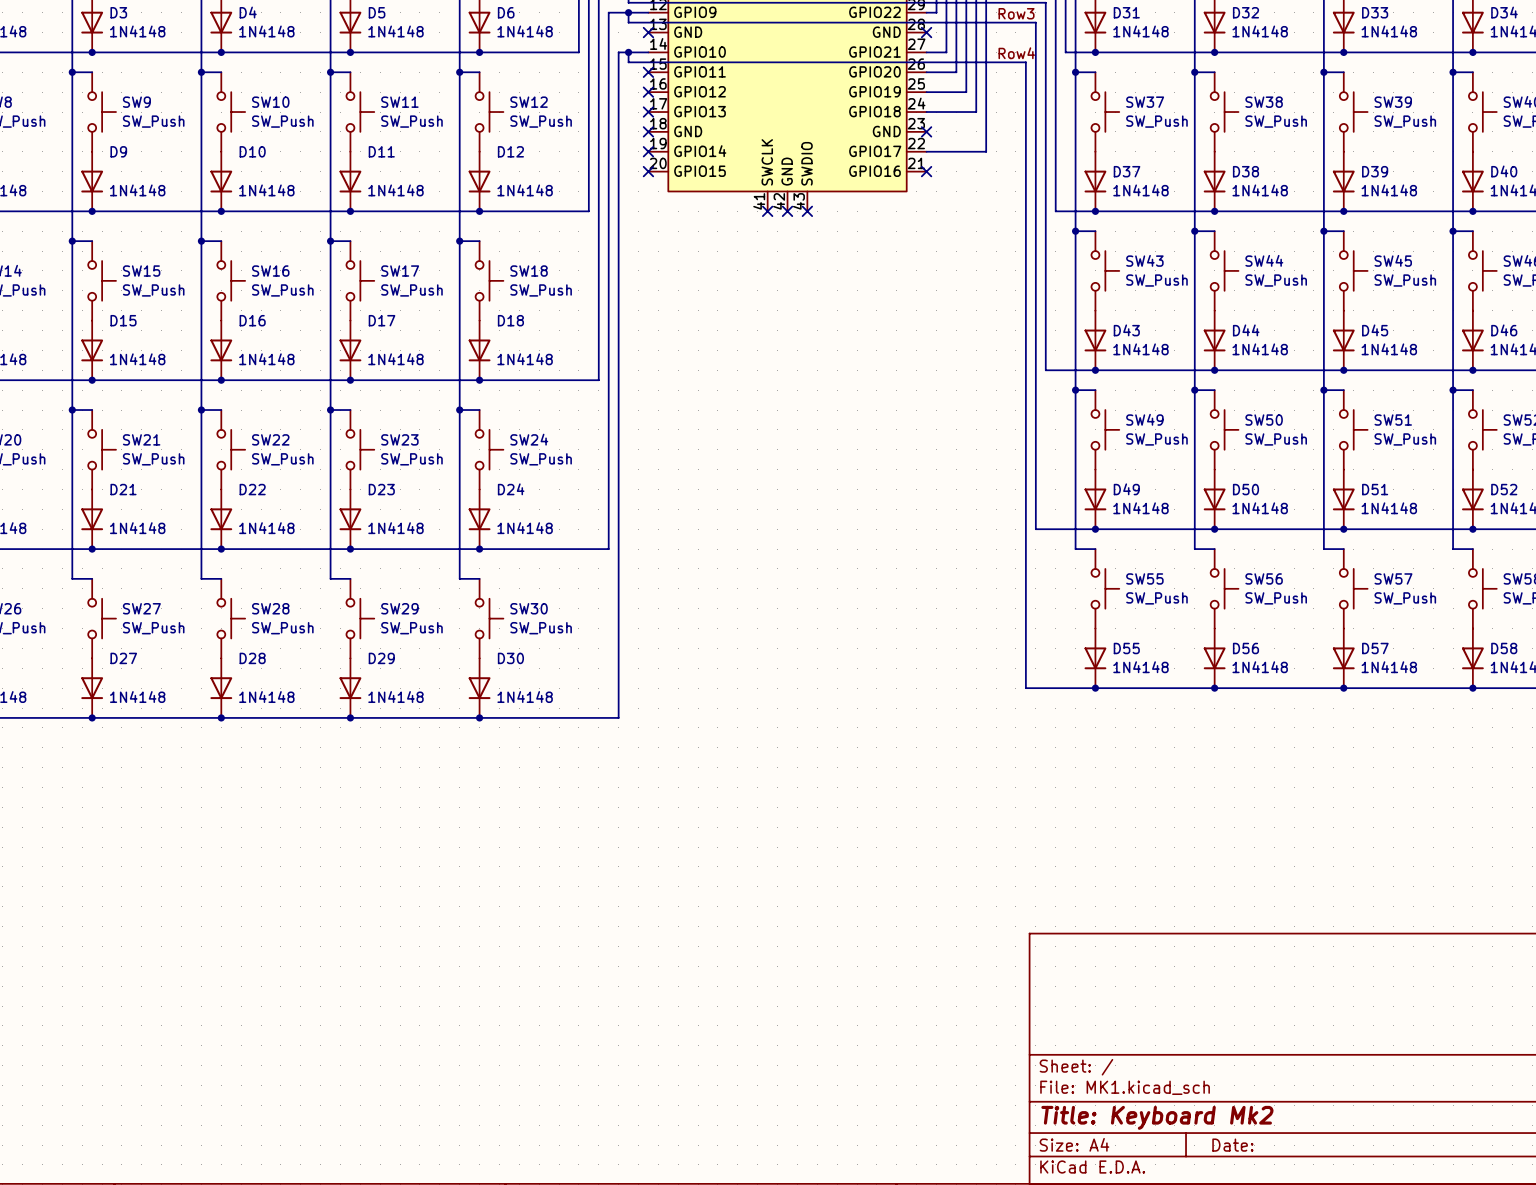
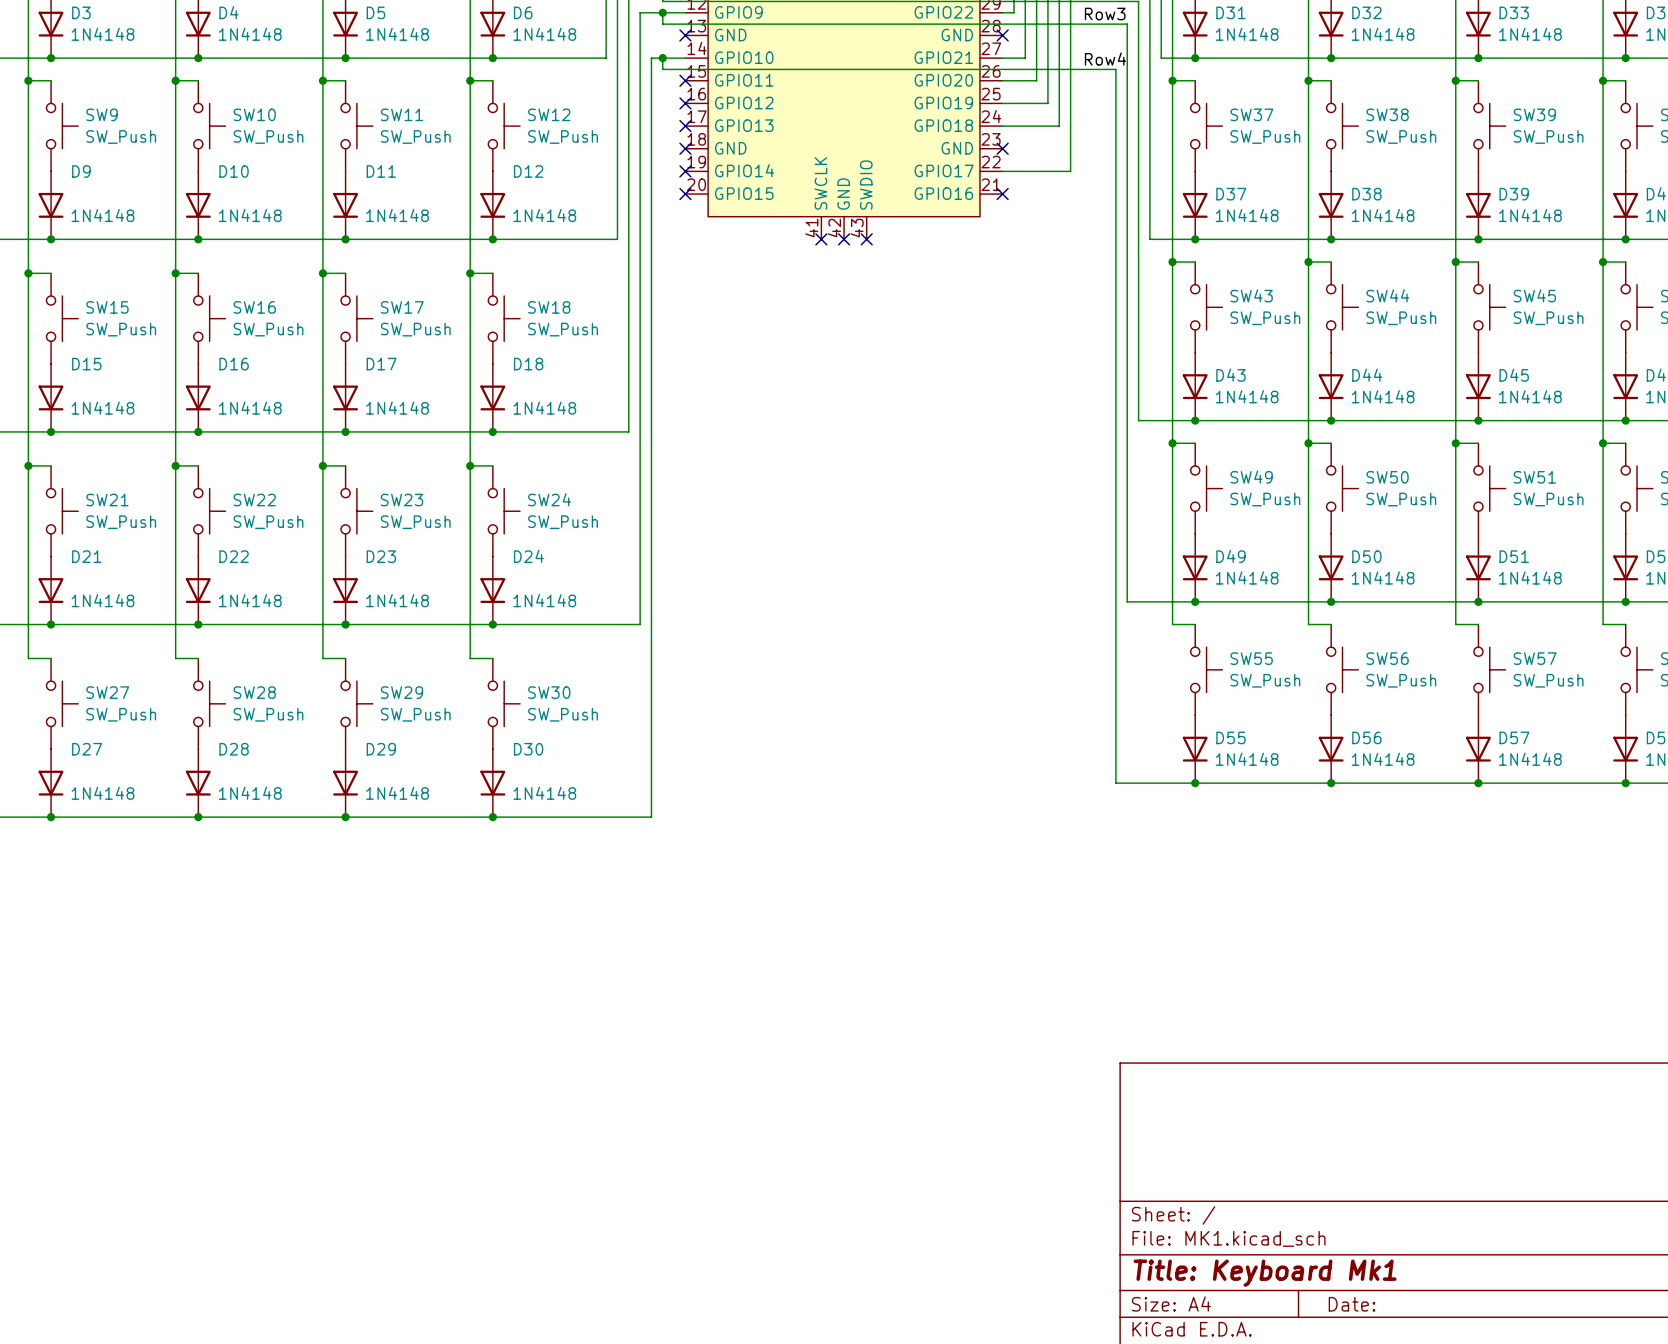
title block: Title: Keyboard Mk2 (1157, 1117) -> Title: Keyboard Mk1 (1265, 1273)

